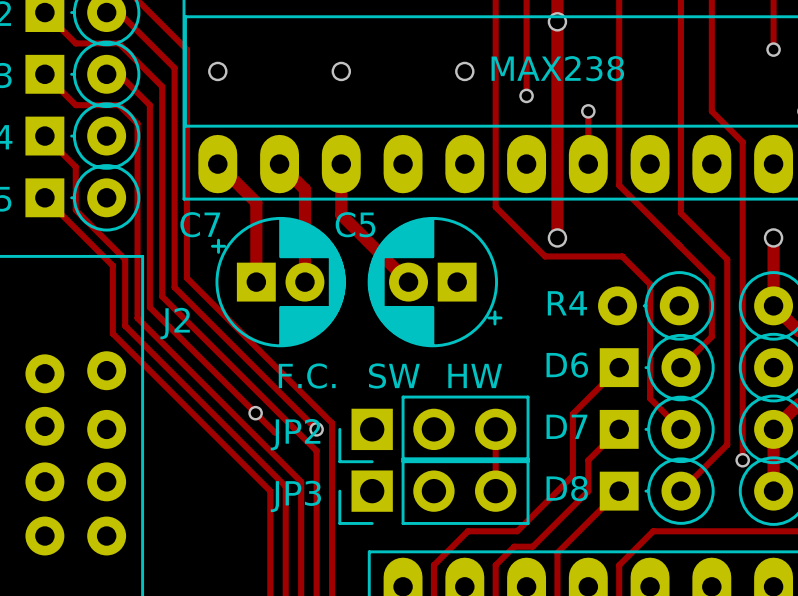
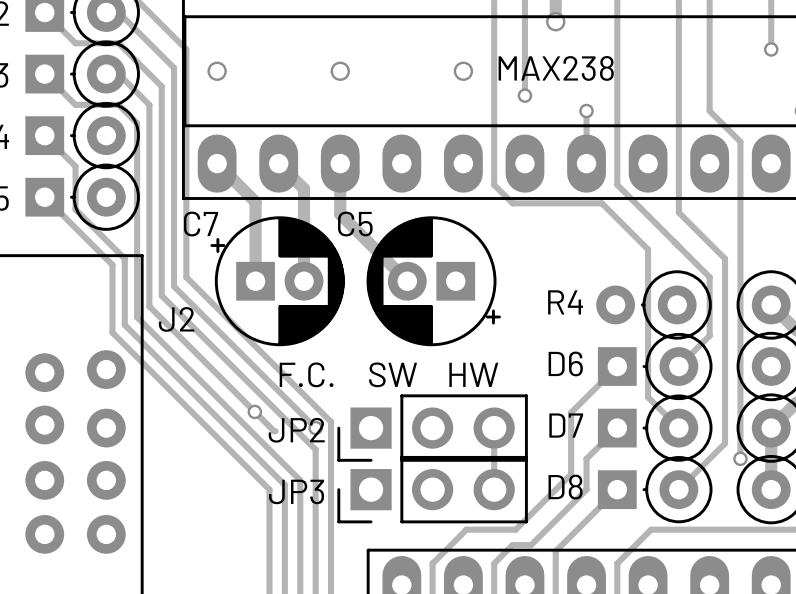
track: (557, 21) (557, 237) -> none
track: (495, 185) (495, 207) (545, 256) (622, 256) (650, 284) -> (494, 184) (512, 203) (601, 203) (648, 249) (648, 283)
via: (557, 237) -> none
track: (773, 237) (773, 305) -> none
via: (773, 237) -> none

